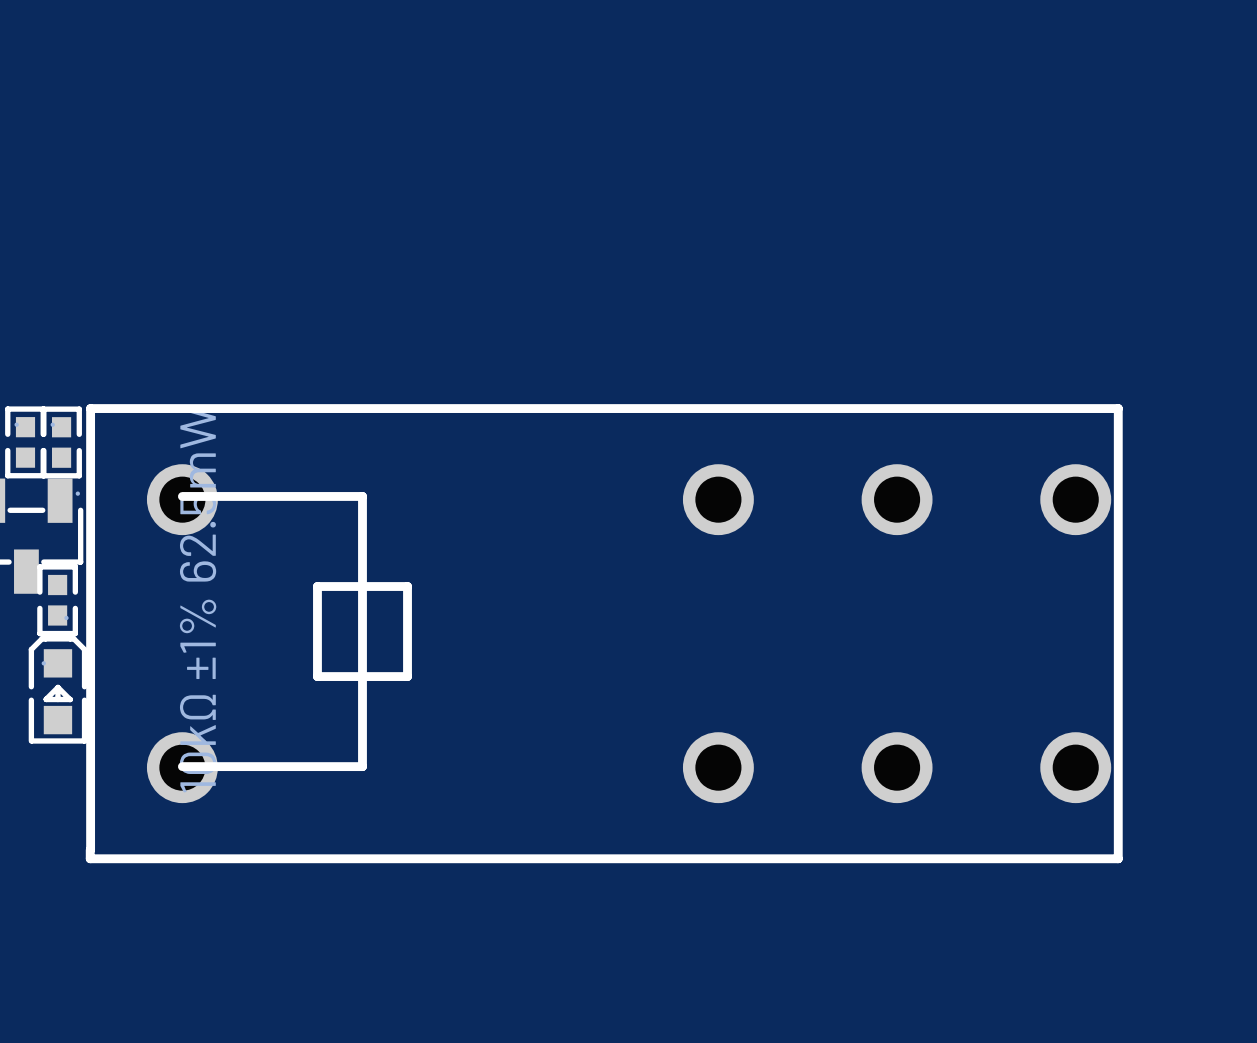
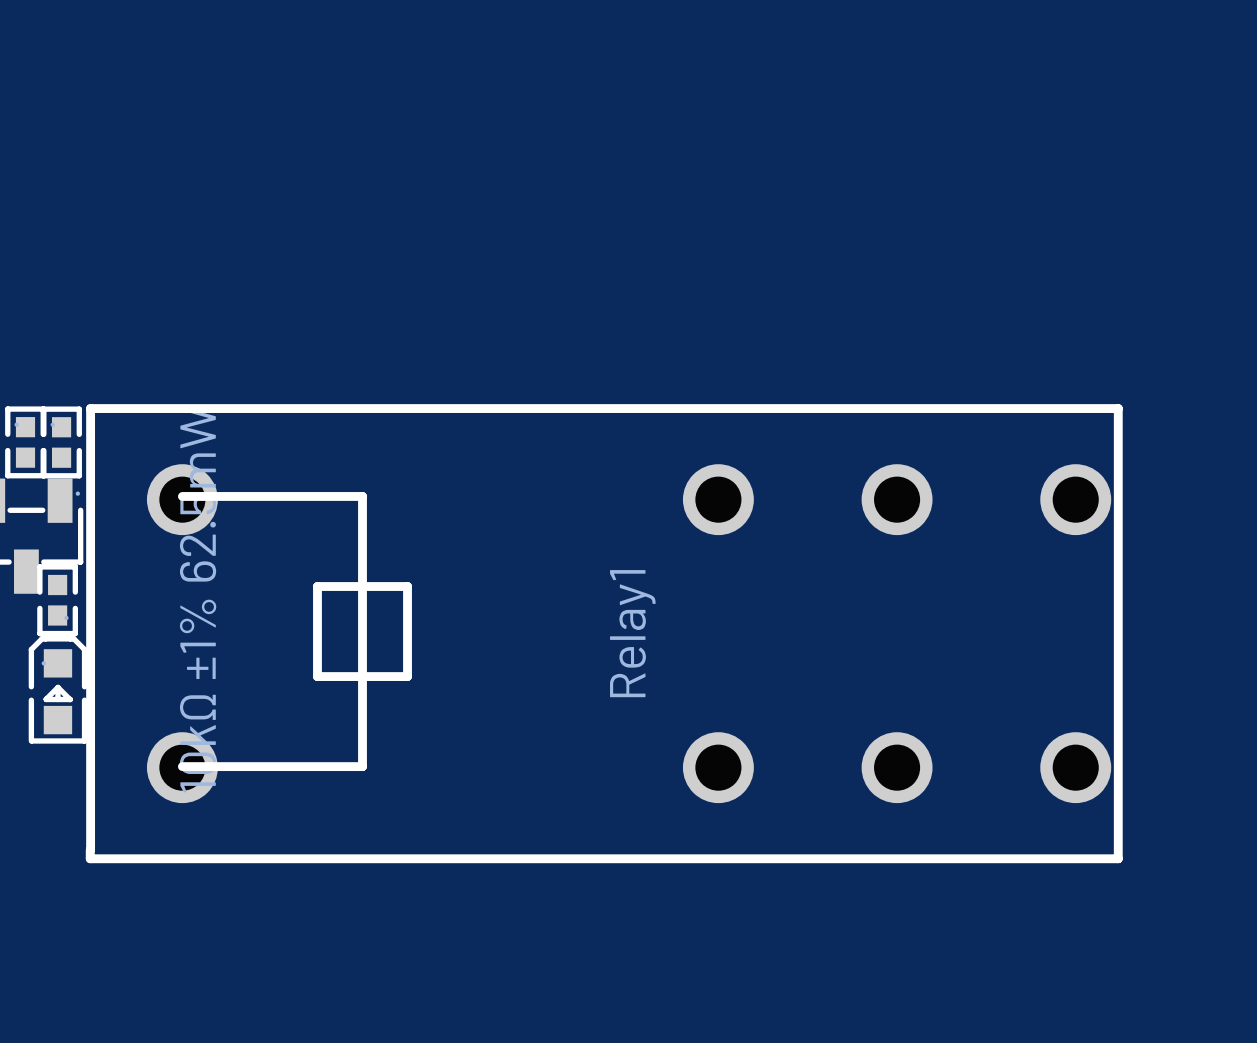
Relay1 name: none -> Relay1 (632, 633)

